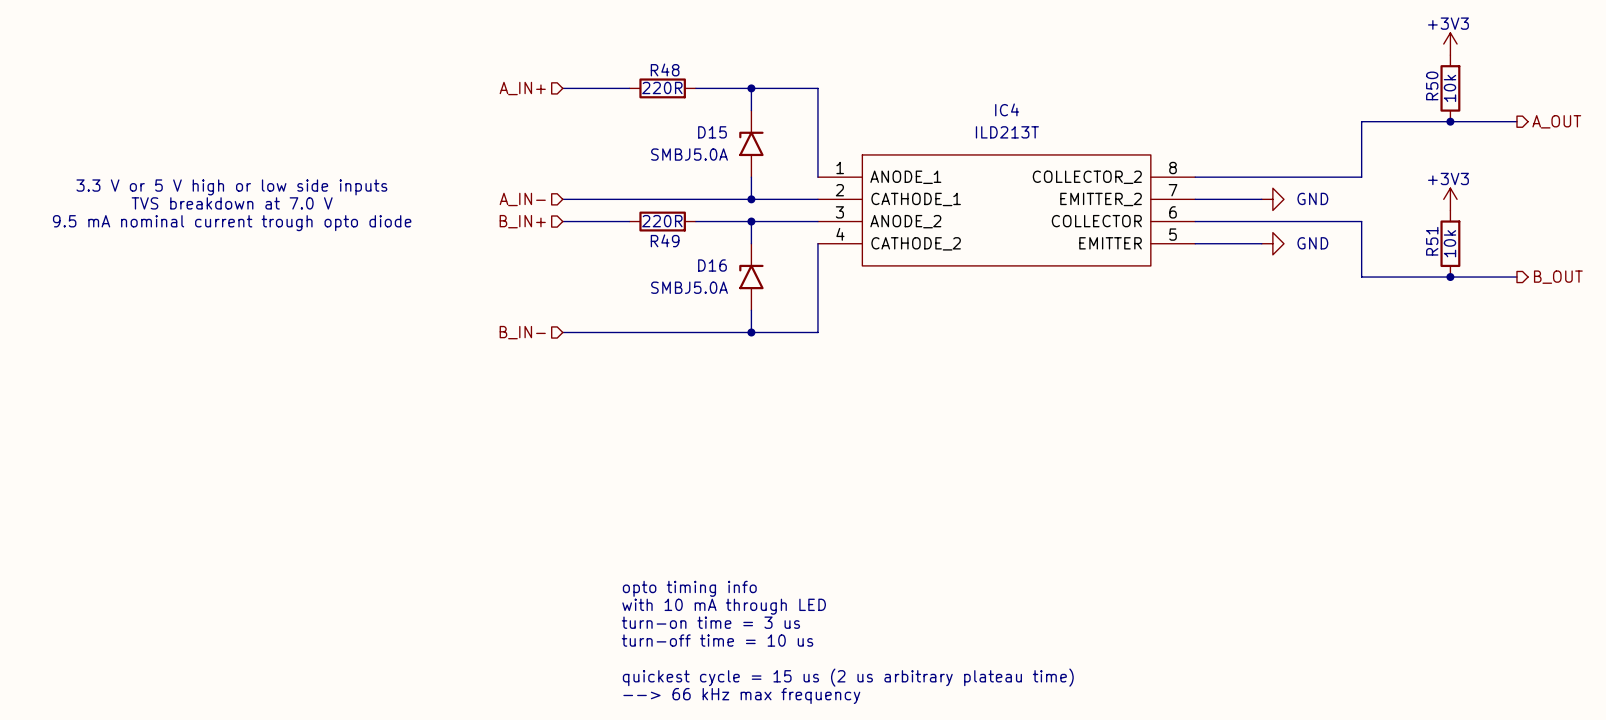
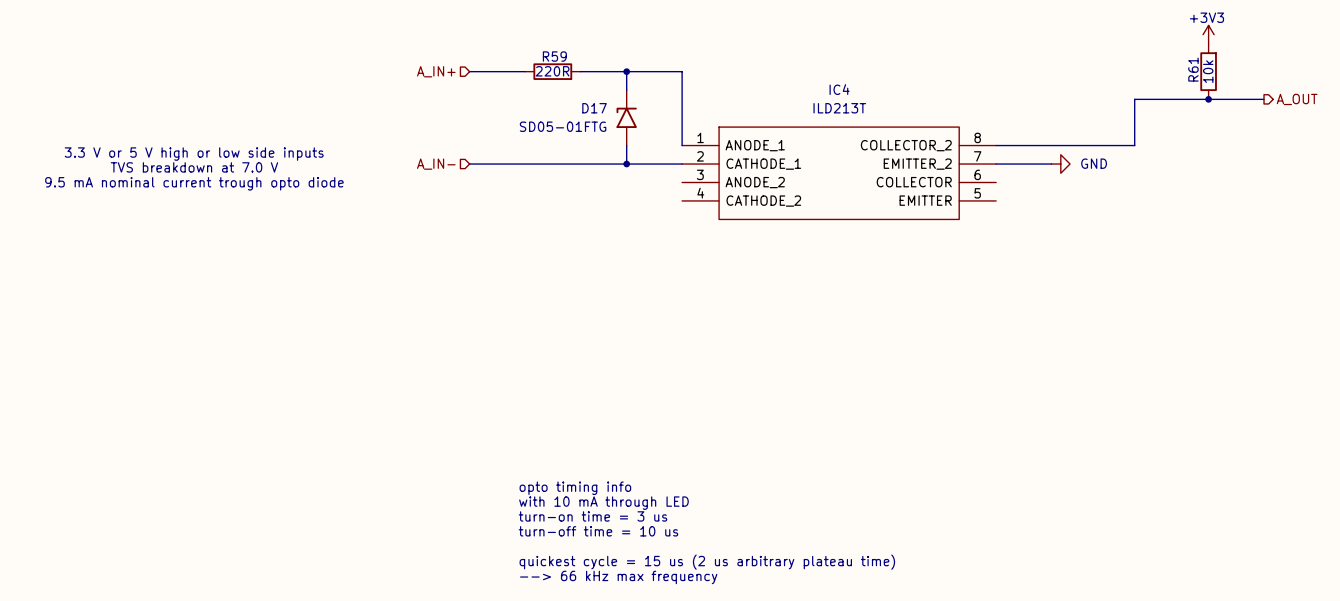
R48 name: R48 (665, 69) -> R59 (554, 56)
R50 name: R50 (1432, 85) -> R61 (1193, 69)
D15 name: D15 (712, 132) -> D17 (594, 108)
D15 value: SMBJ5.0A (689, 154) -> SD05-01FTG (563, 126)
power symbol: +3V3 (1450, 199) -> none
hierarchical label: B_IN+ (522, 221) -> none
wire: (562, 221) (629, 221) -> none
R49: 220R (662, 221) -> none
wire: (695, 221) (817, 221) -> none
wire: (751, 221) (751, 243) -> none
junction: (751, 221) -> none
wire: (1195, 221) (1361, 221) (1361, 277) (1516, 277) -> none
wire: (817, 243) (817, 332) (562, 332) -> none
wire: (1195, 243) (1261, 243) -> none
power symbol: GND (1272, 243) -> none
R51: 10k (1450, 243) -> none
D16: SMBJ5.0A (751, 277) -> none
junction: (1450, 277) -> none
hierarchical label: B_OUT (1558, 277) -> none
wire: (751, 310) (751, 332) -> none
hierarchical label: B_IN- (522, 332) -> none
junction: (751, 332) -> none

